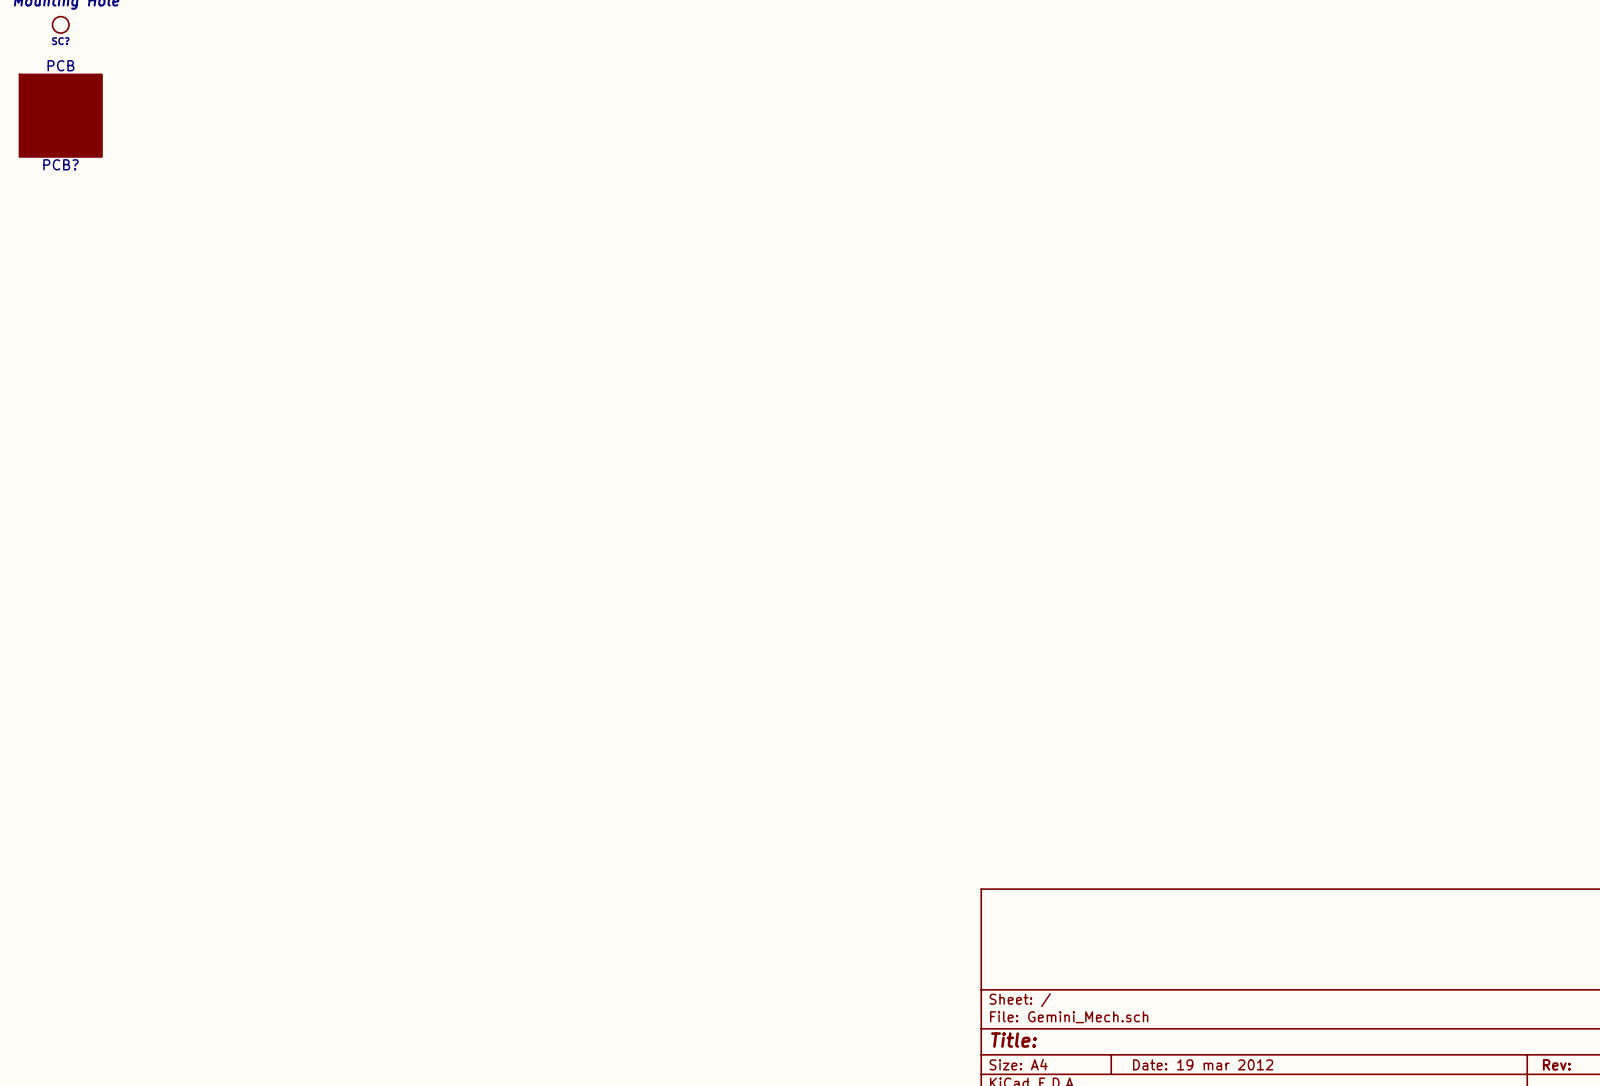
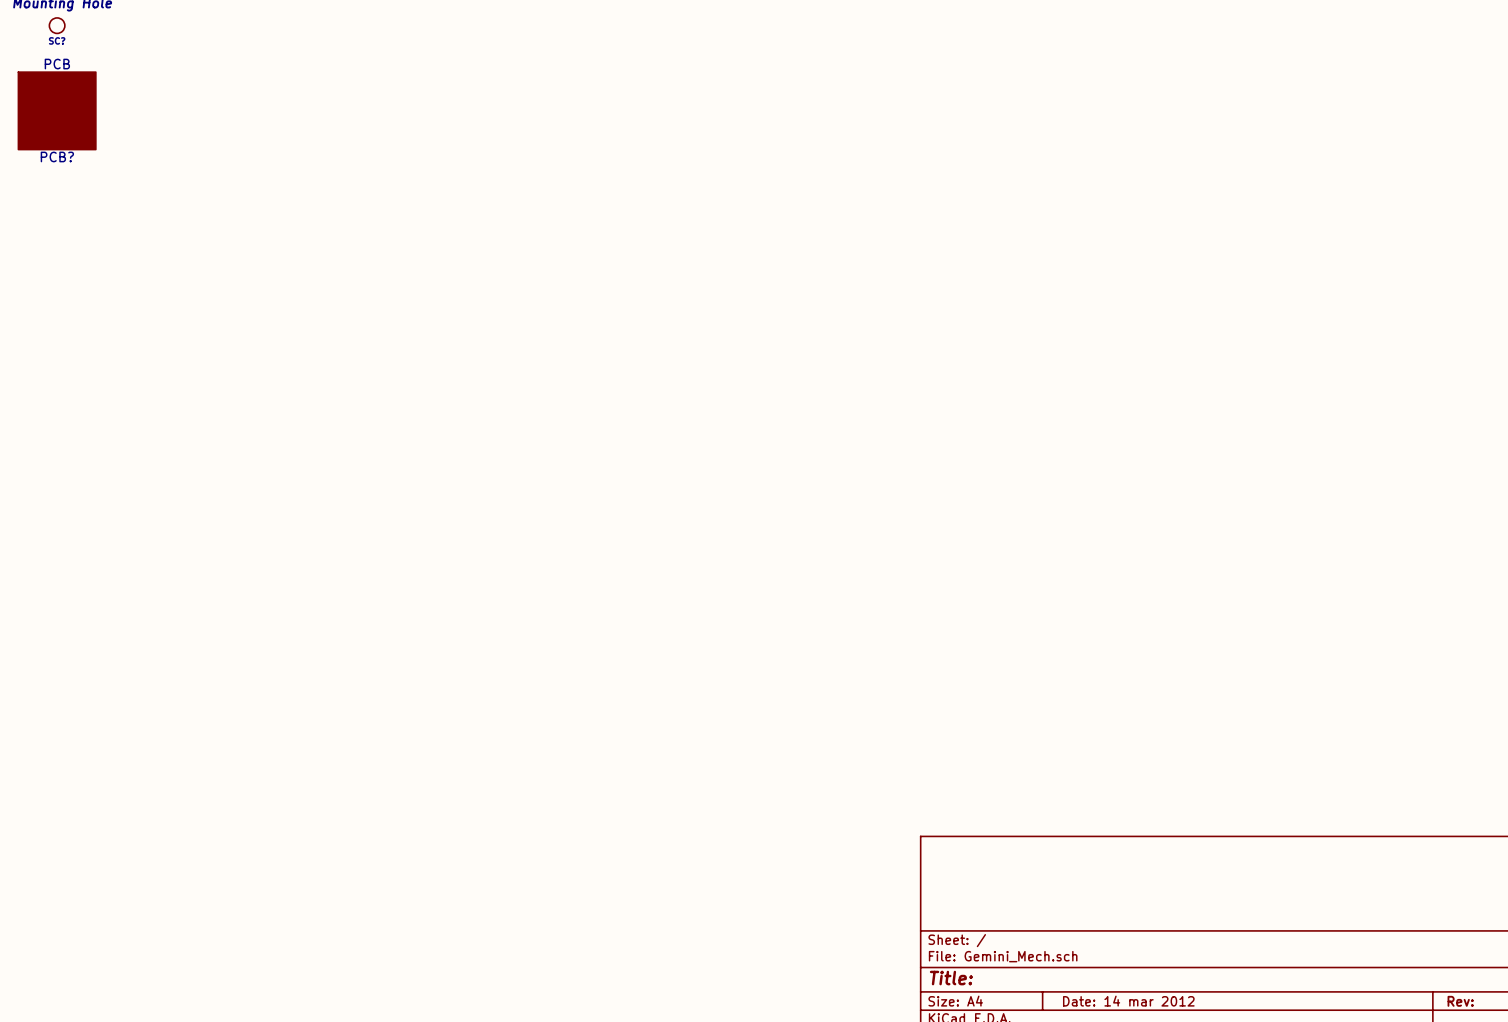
title block: Date: 19 mar 2012 (1203, 1064) -> Date: 14 mar 2012 (1128, 1001)

